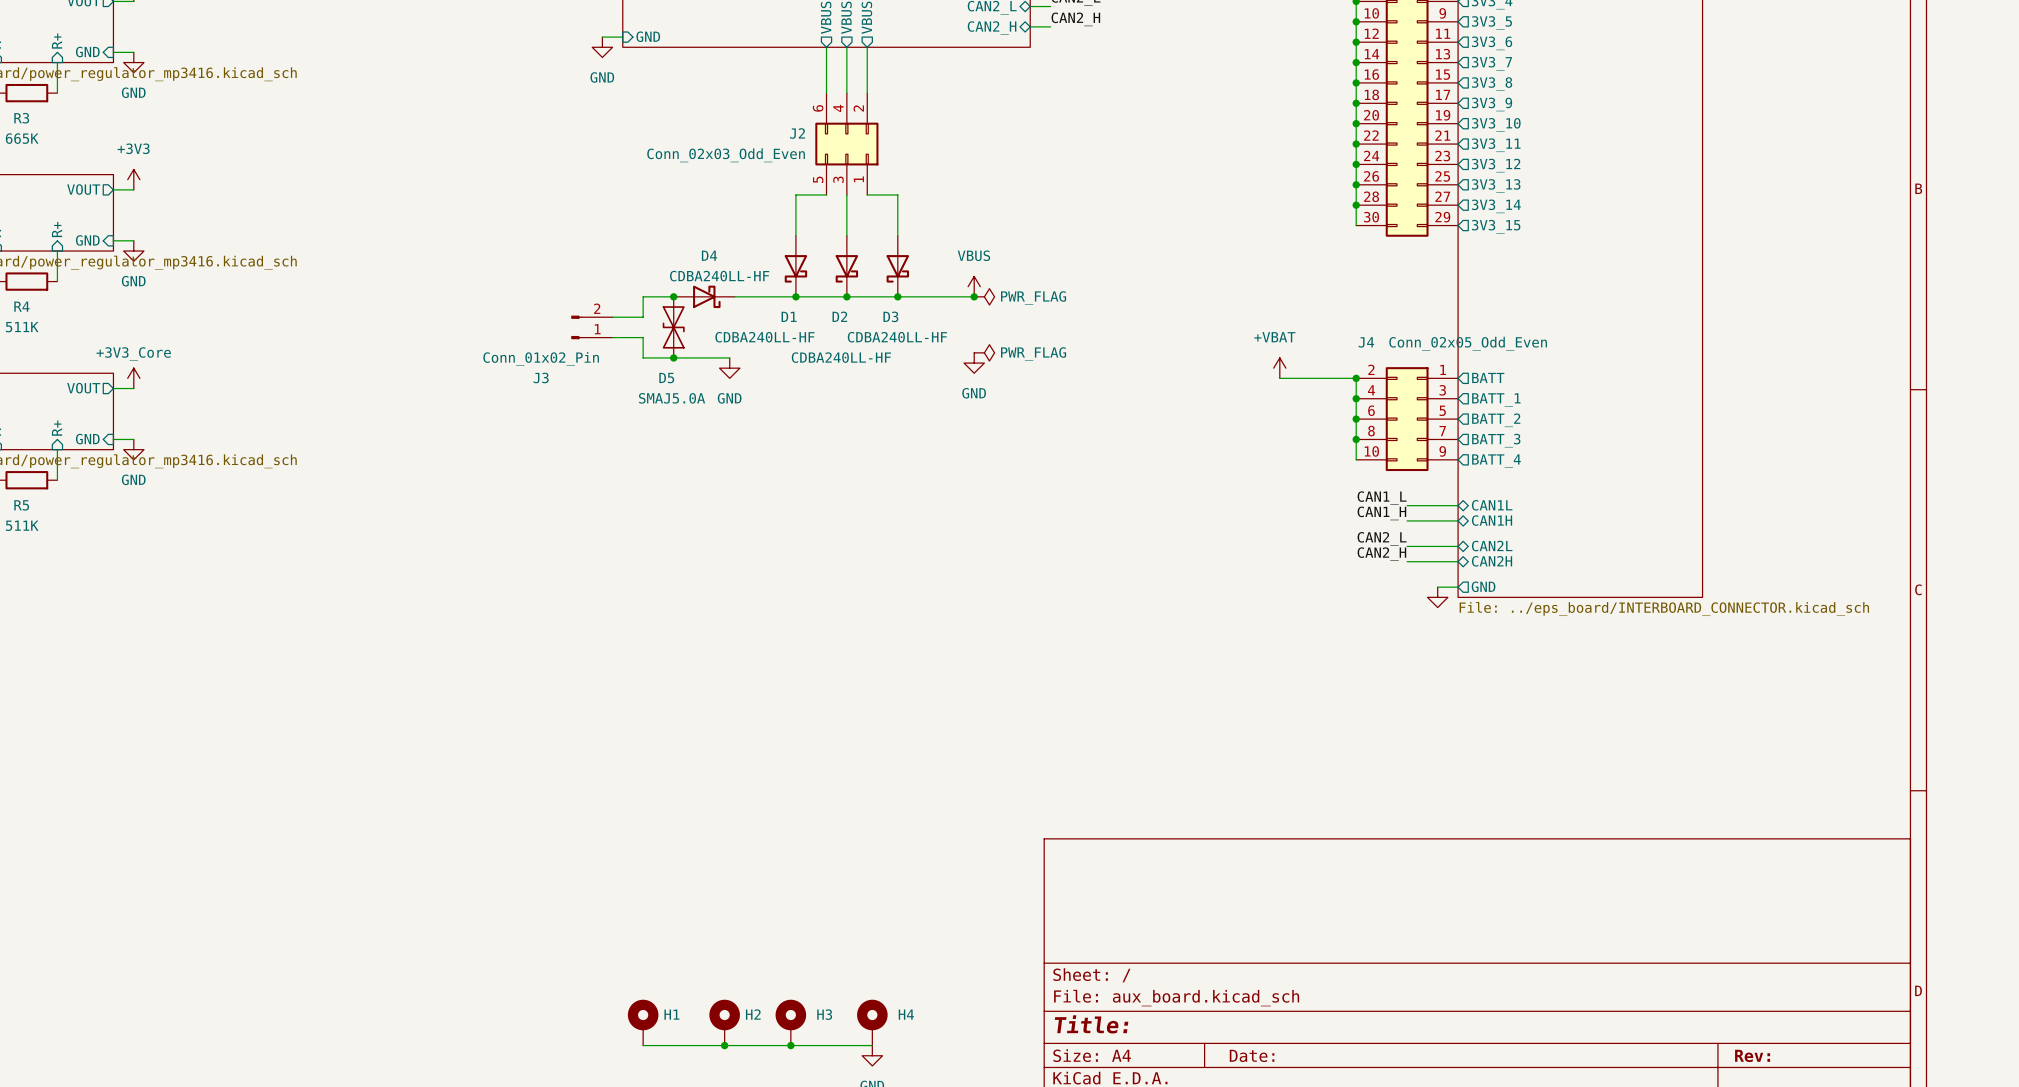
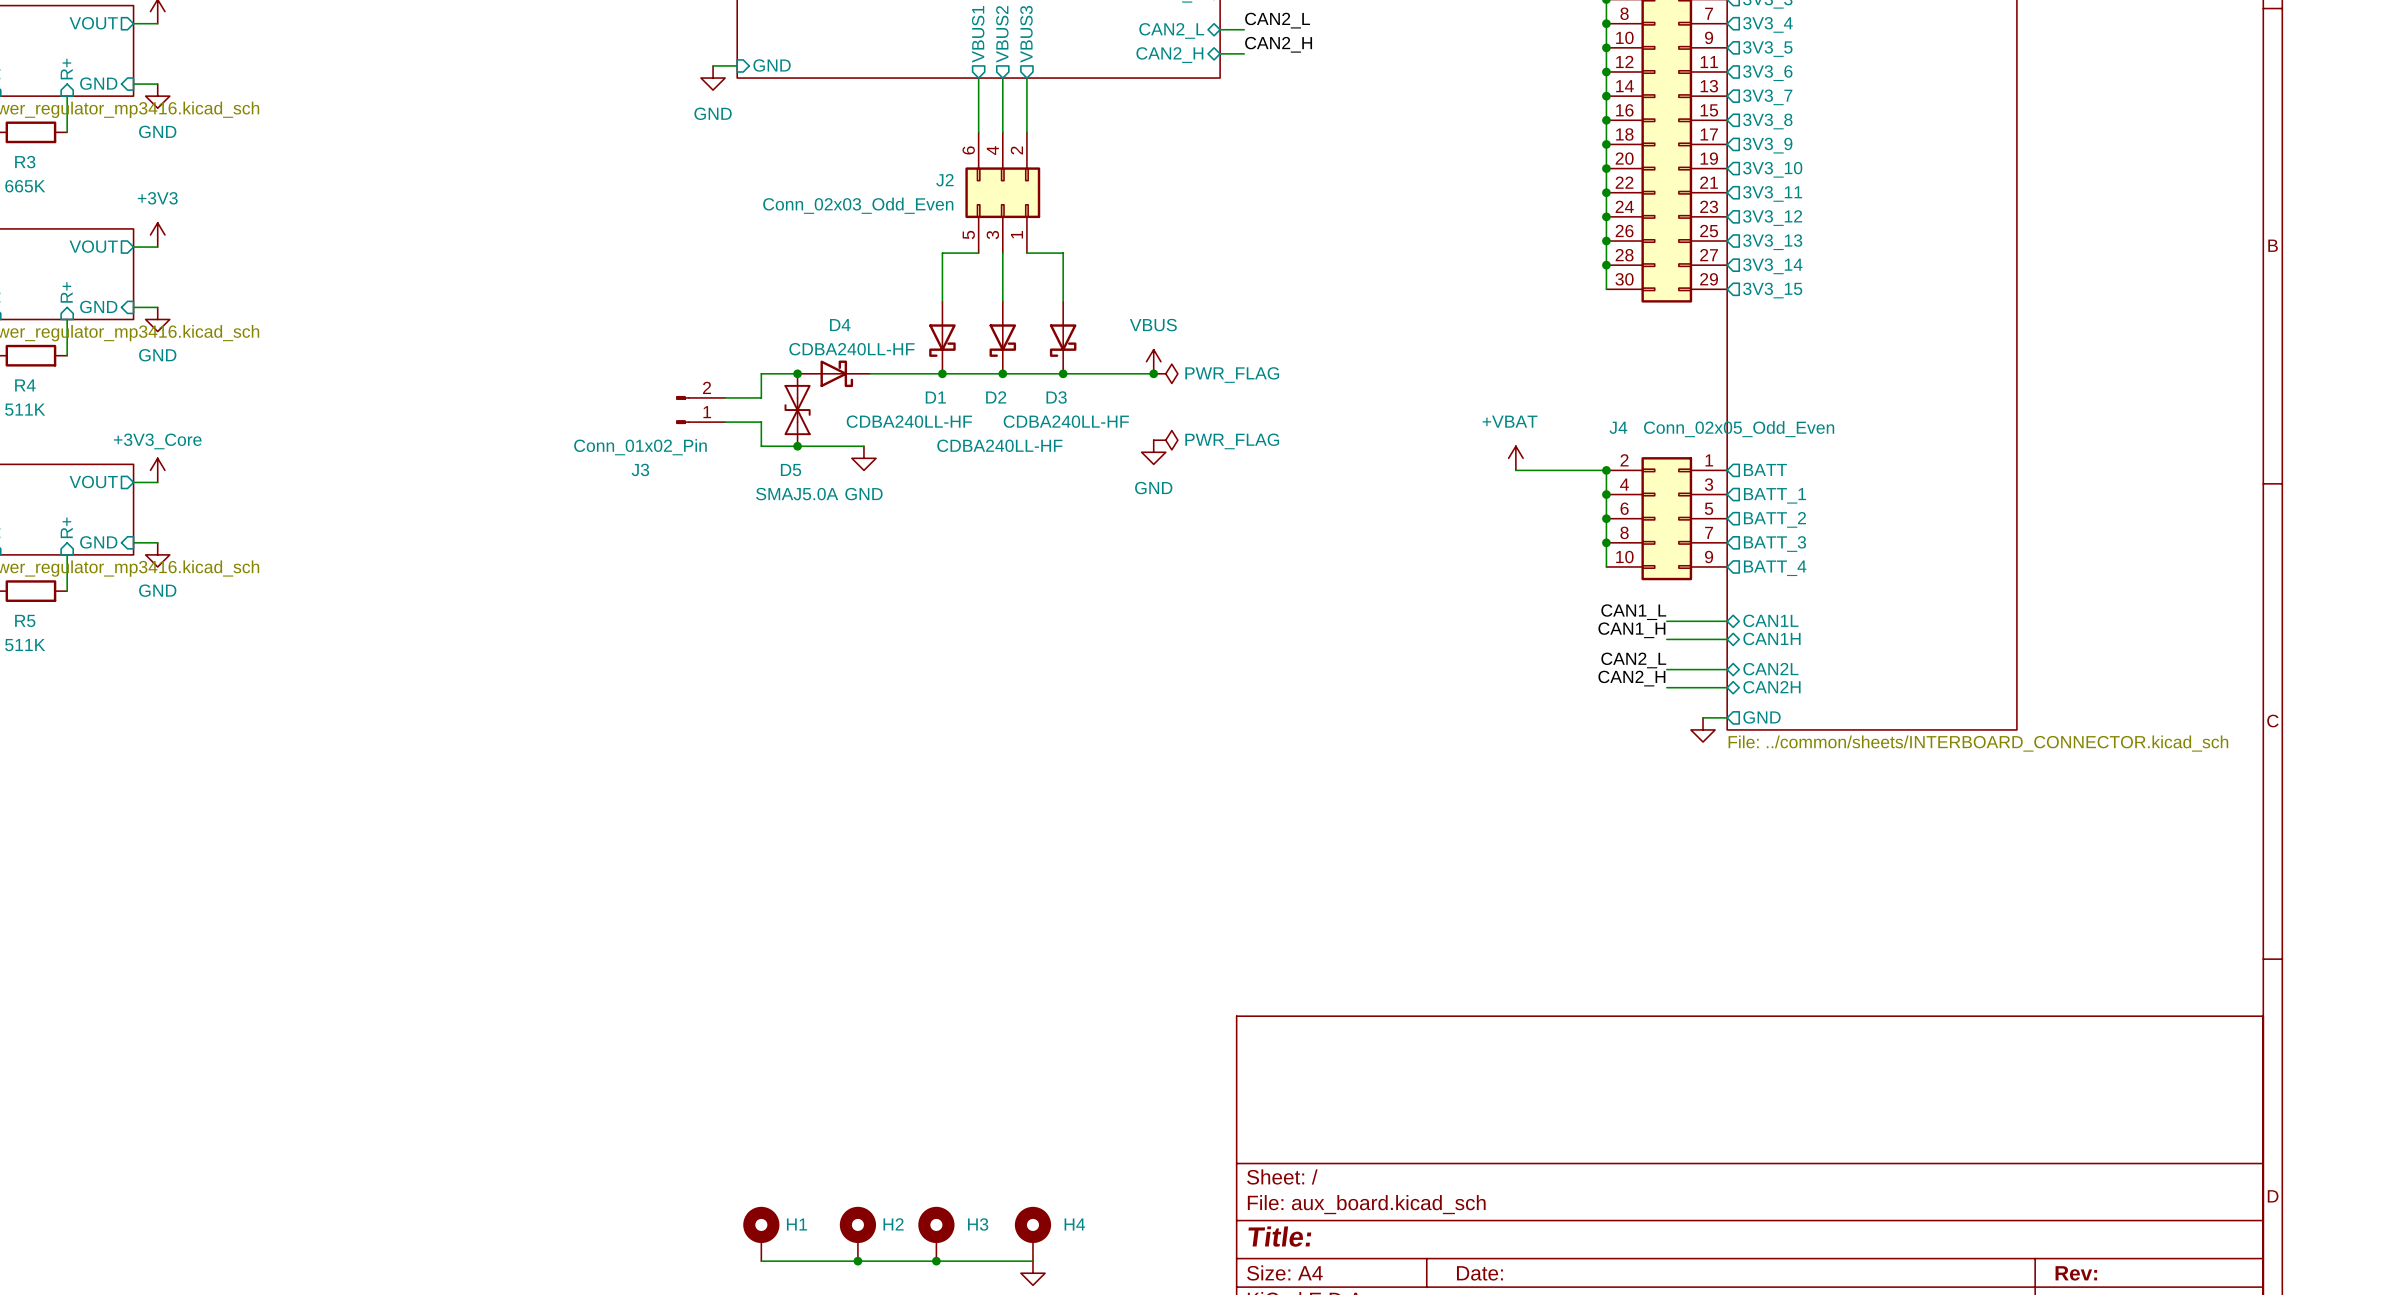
sheet value: File: ../eps_board/INTERBOARD_CONNECTOR.kicad_sch (1664, 609) -> File: ../common/sheets/INTERBOARD_CONNECTOR.kicad_sch (1978, 743)

